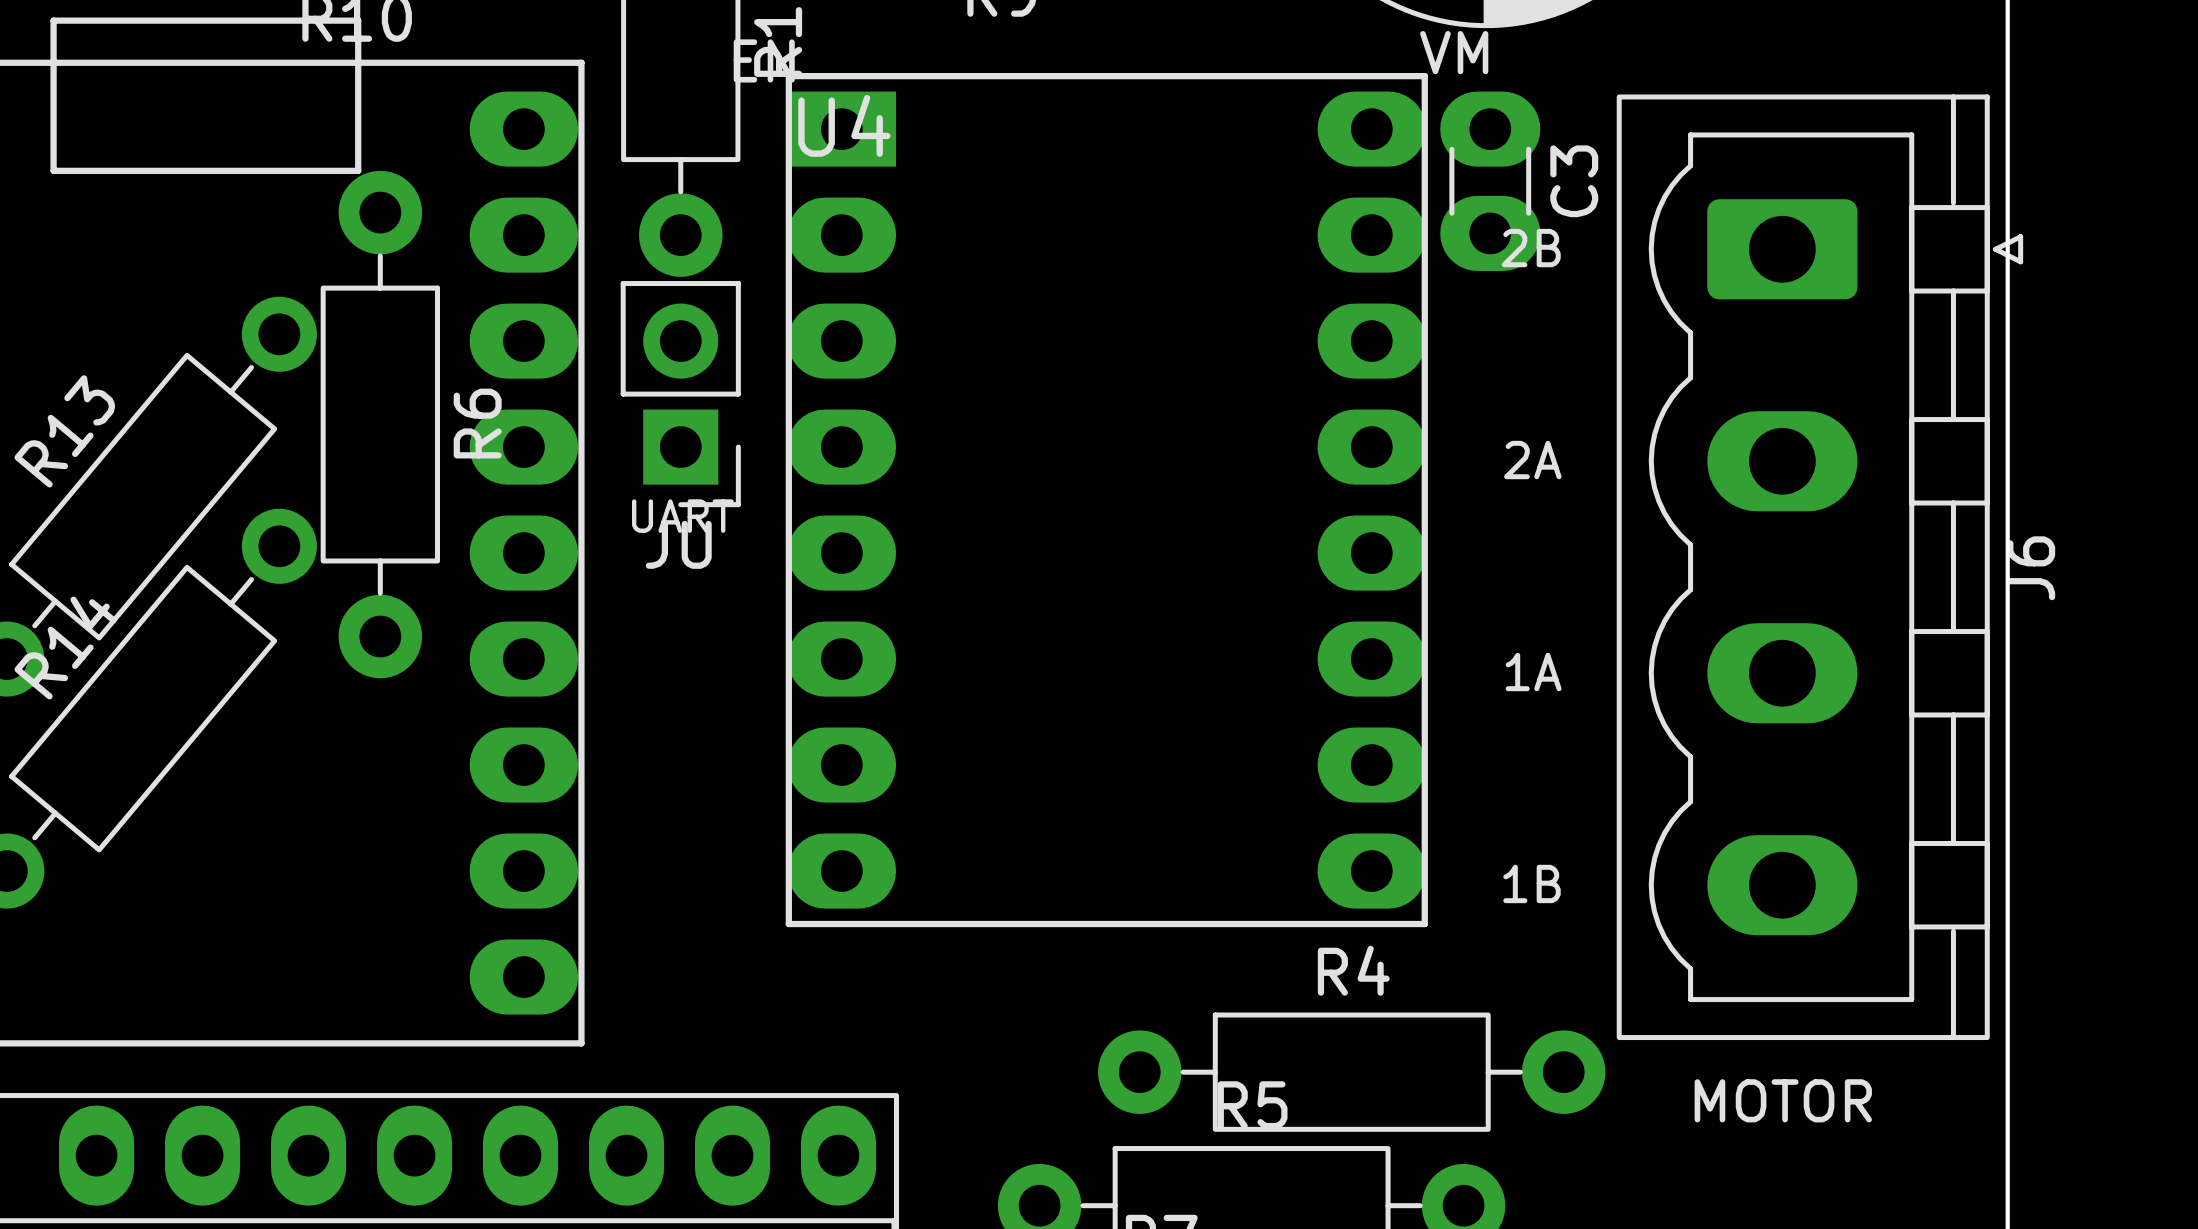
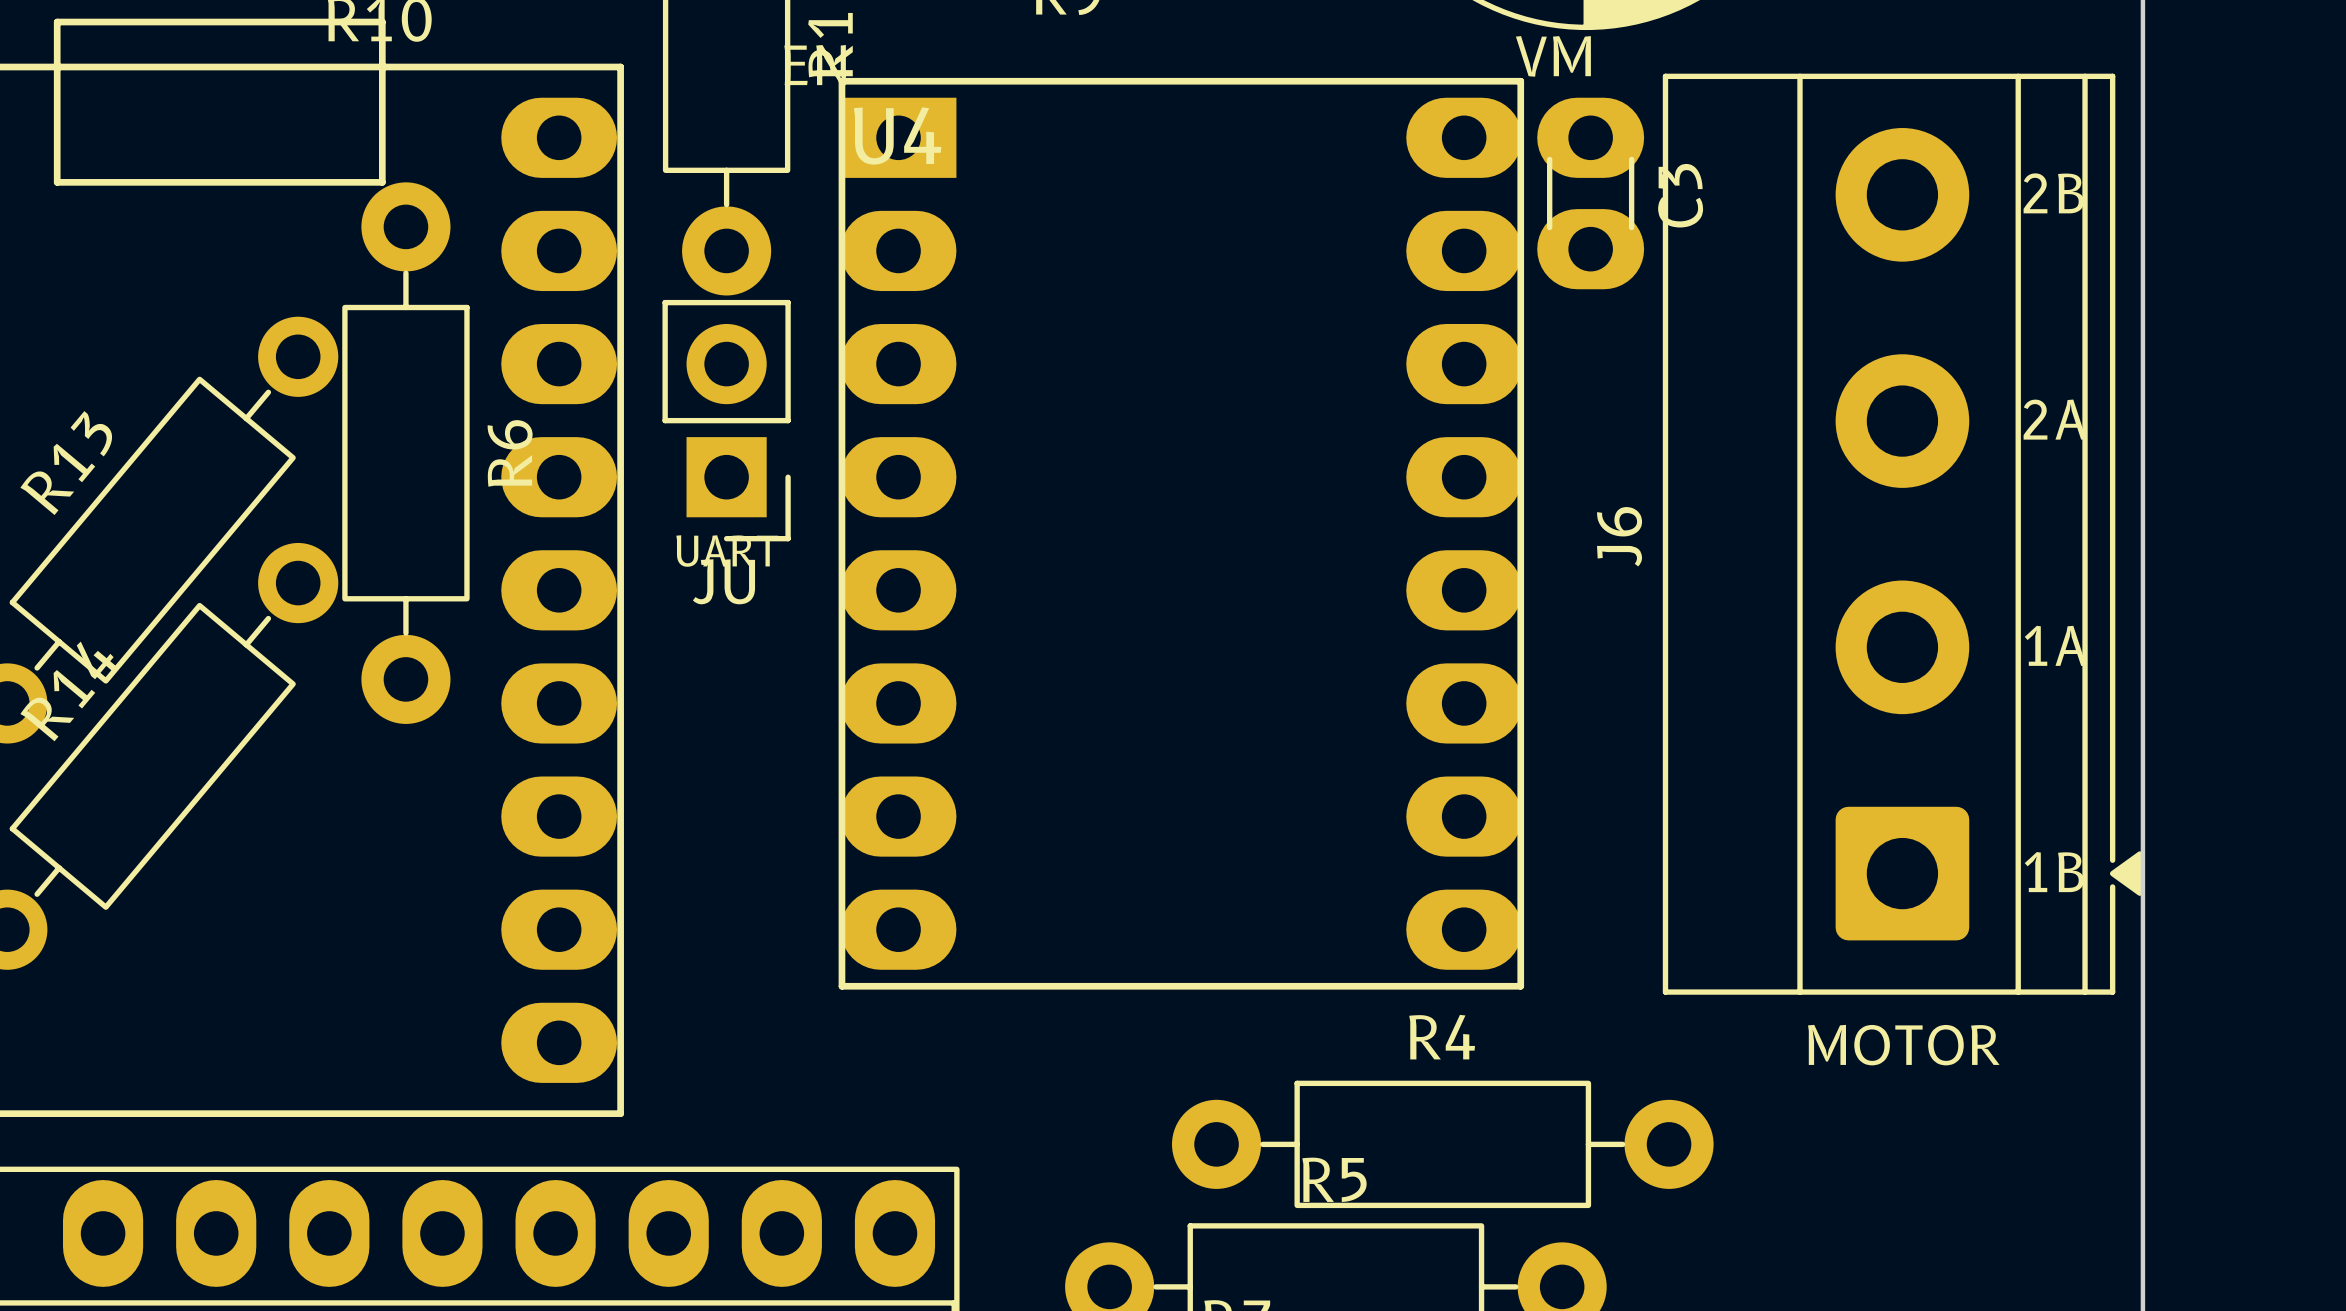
J6 footprint: [1616, 94, 2024, 1041] -> [1662, 73, 2143, 995]
text position: 2B (1531, 248) -> 2B (2053, 193)
text position: 2A (1532, 460) -> 2A (2055, 419)
J6 name position: J6 (2031, 568) -> J6 (1619, 536)
text position: 1A (1533, 672) -> 1A (2055, 645)
text position: 1B (1532, 883) -> 1B (2054, 872)
text position: MOTOR (1783, 1100) -> MOTOR (1903, 1045)

